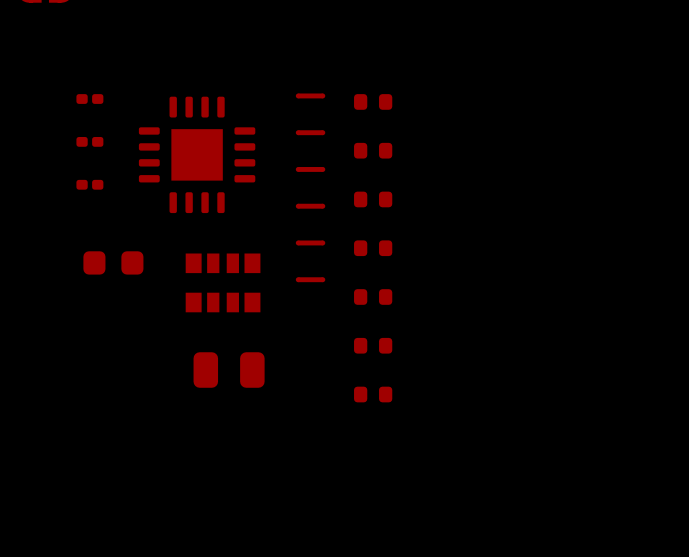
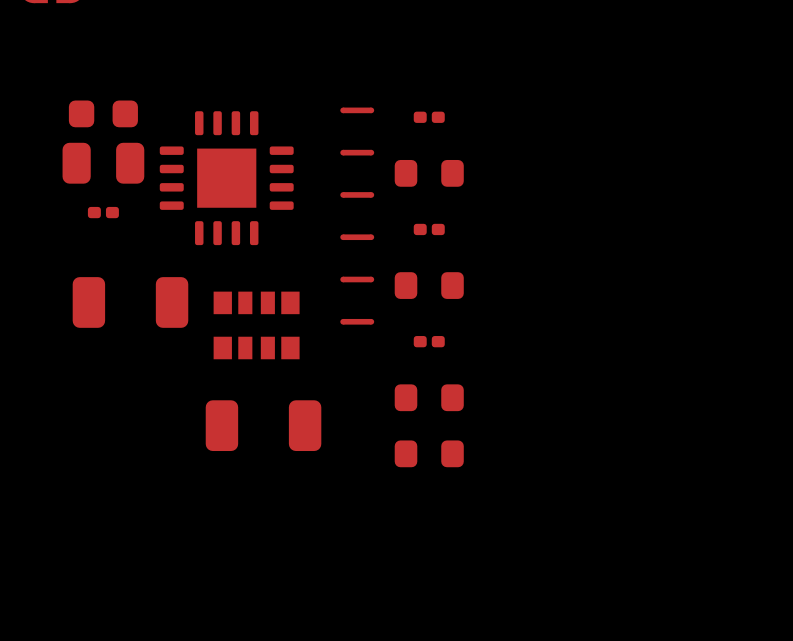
part footprint: [76, 94, 104, 104] -> [68, 100, 138, 128]
part footprint: [354, 94, 393, 110] -> [413, 111, 445, 123]
part footprint: [76, 136, 104, 147] -> [62, 142, 145, 184]
part footprint: [354, 142, 393, 159] -> [394, 159, 464, 187]
part footprint: [354, 191, 393, 208] -> [413, 223, 445, 236]
part footprint: [354, 240, 393, 257] -> [394, 272, 464, 299]
part footprint: [83, 251, 144, 275] -> [72, 277, 189, 328]
part footprint: [354, 289, 393, 305] -> [413, 336, 445, 348]
part footprint: [354, 337, 393, 354] -> [394, 384, 464, 412]
part footprint: [193, 352, 265, 388] -> [205, 400, 322, 452]
part footprint: [354, 386, 393, 403] -> [394, 440, 464, 468]

